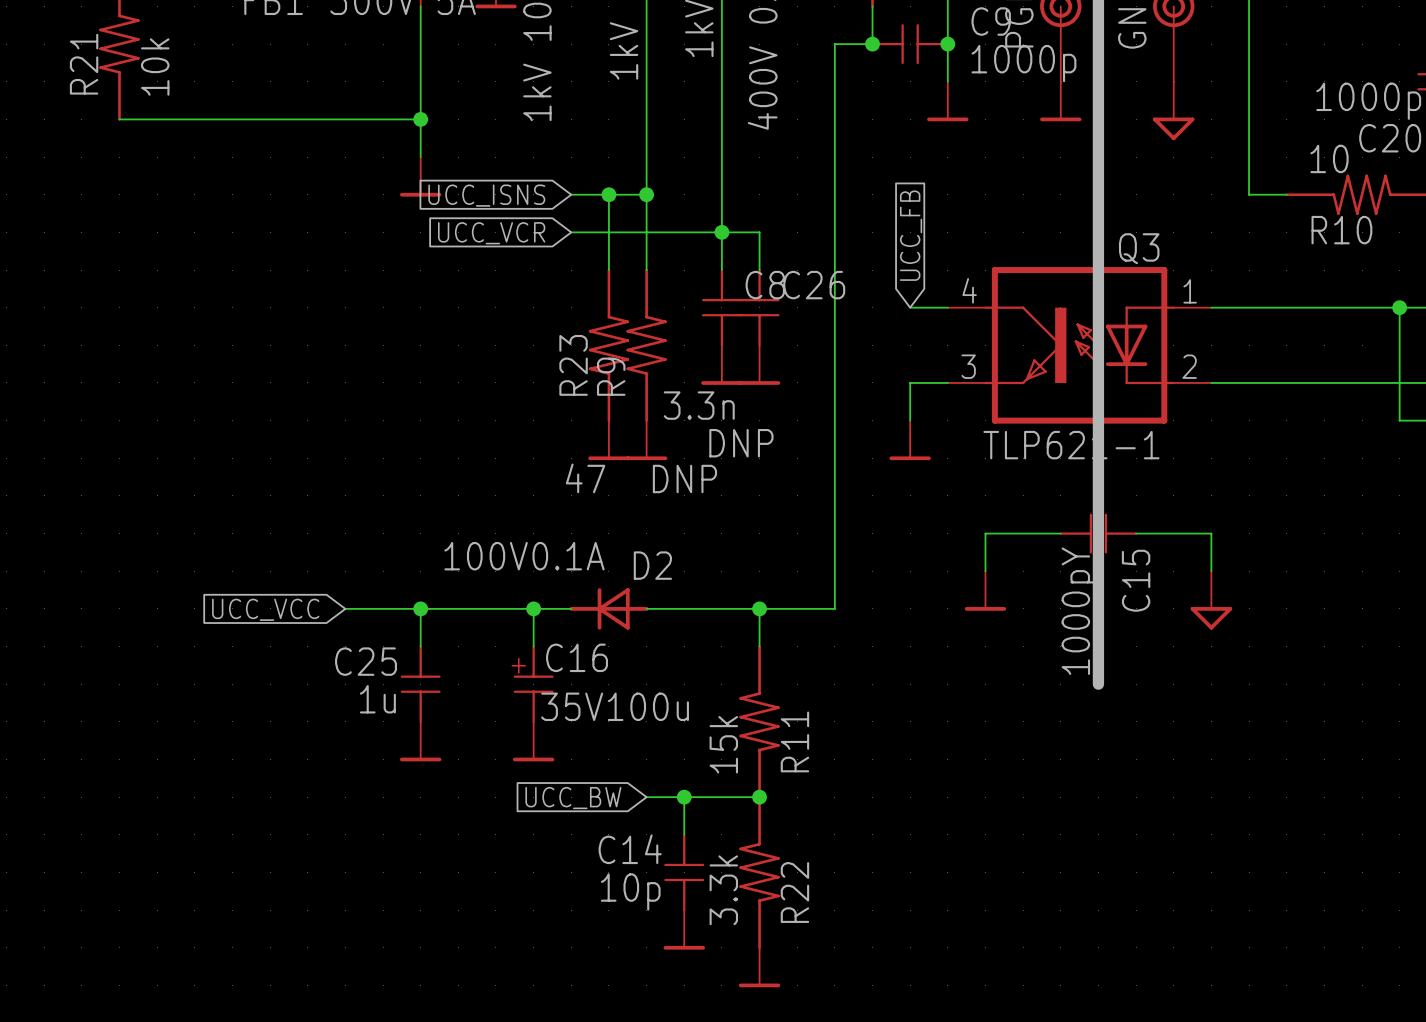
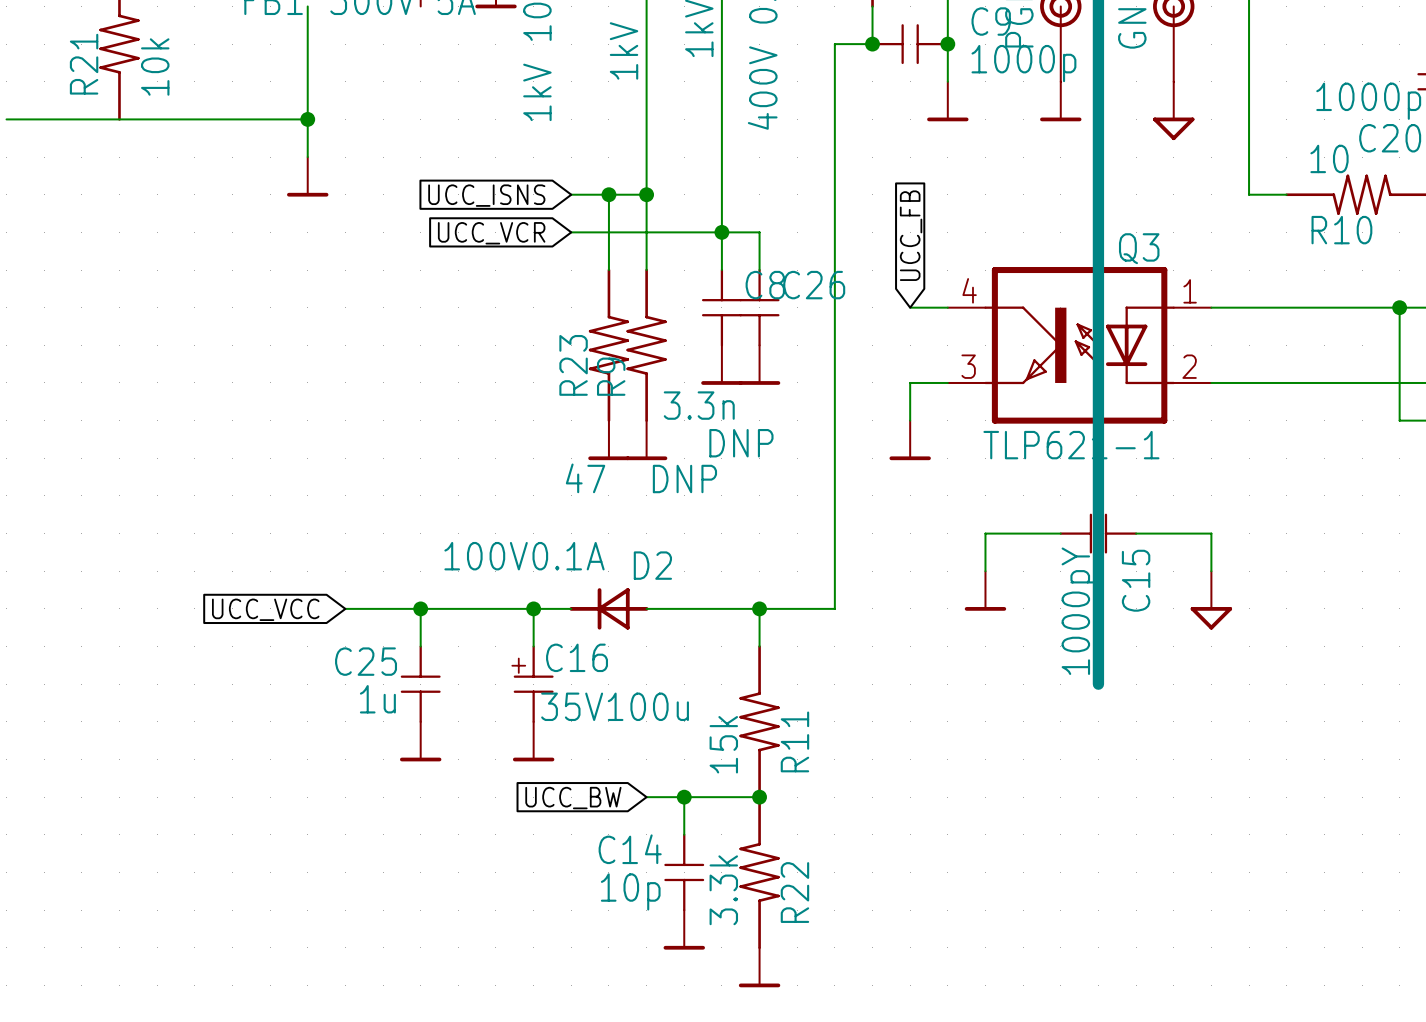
wire: (420, 6) (420, 157) -> (307, 6) (307, 157)
wire: (307, 119) (420, 119) -> (6, 119) (119, 119)
junction: none -> (307, 119)
junction: (420, 119) -> none
power symbol position: (420, 176) -> (307, 176)

